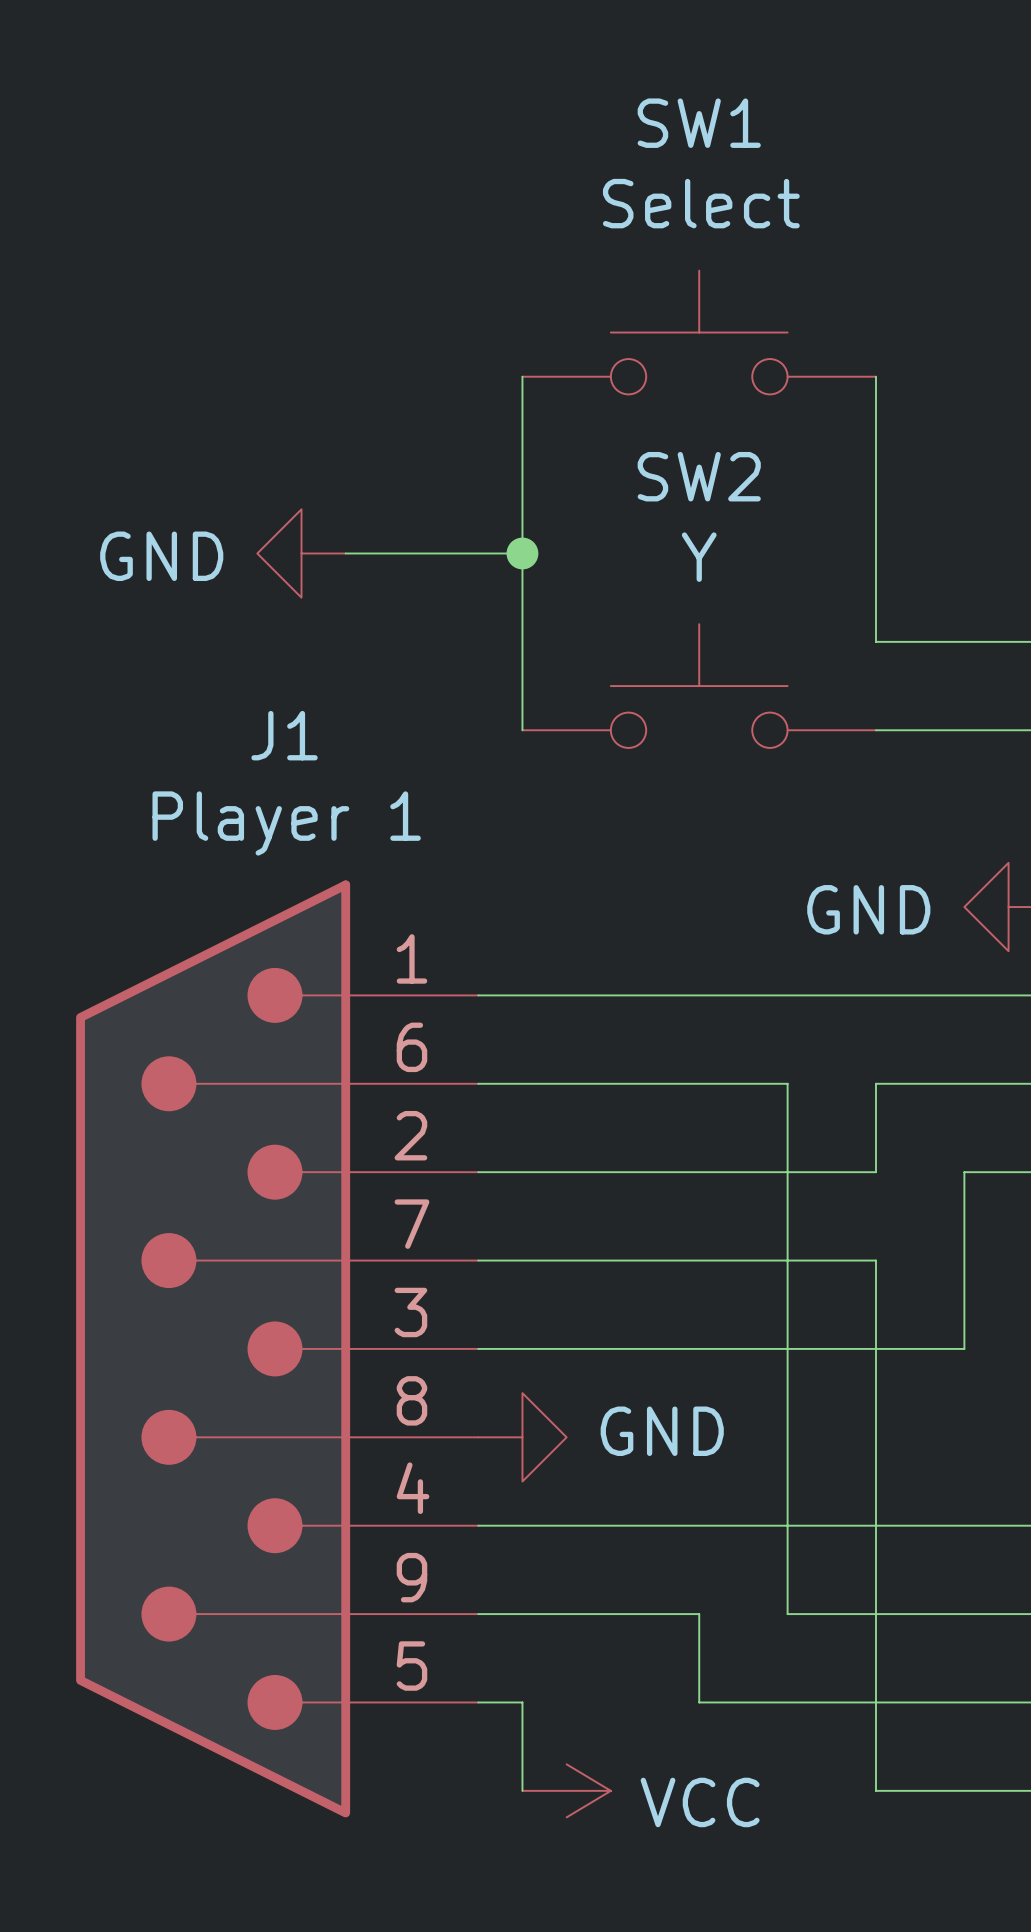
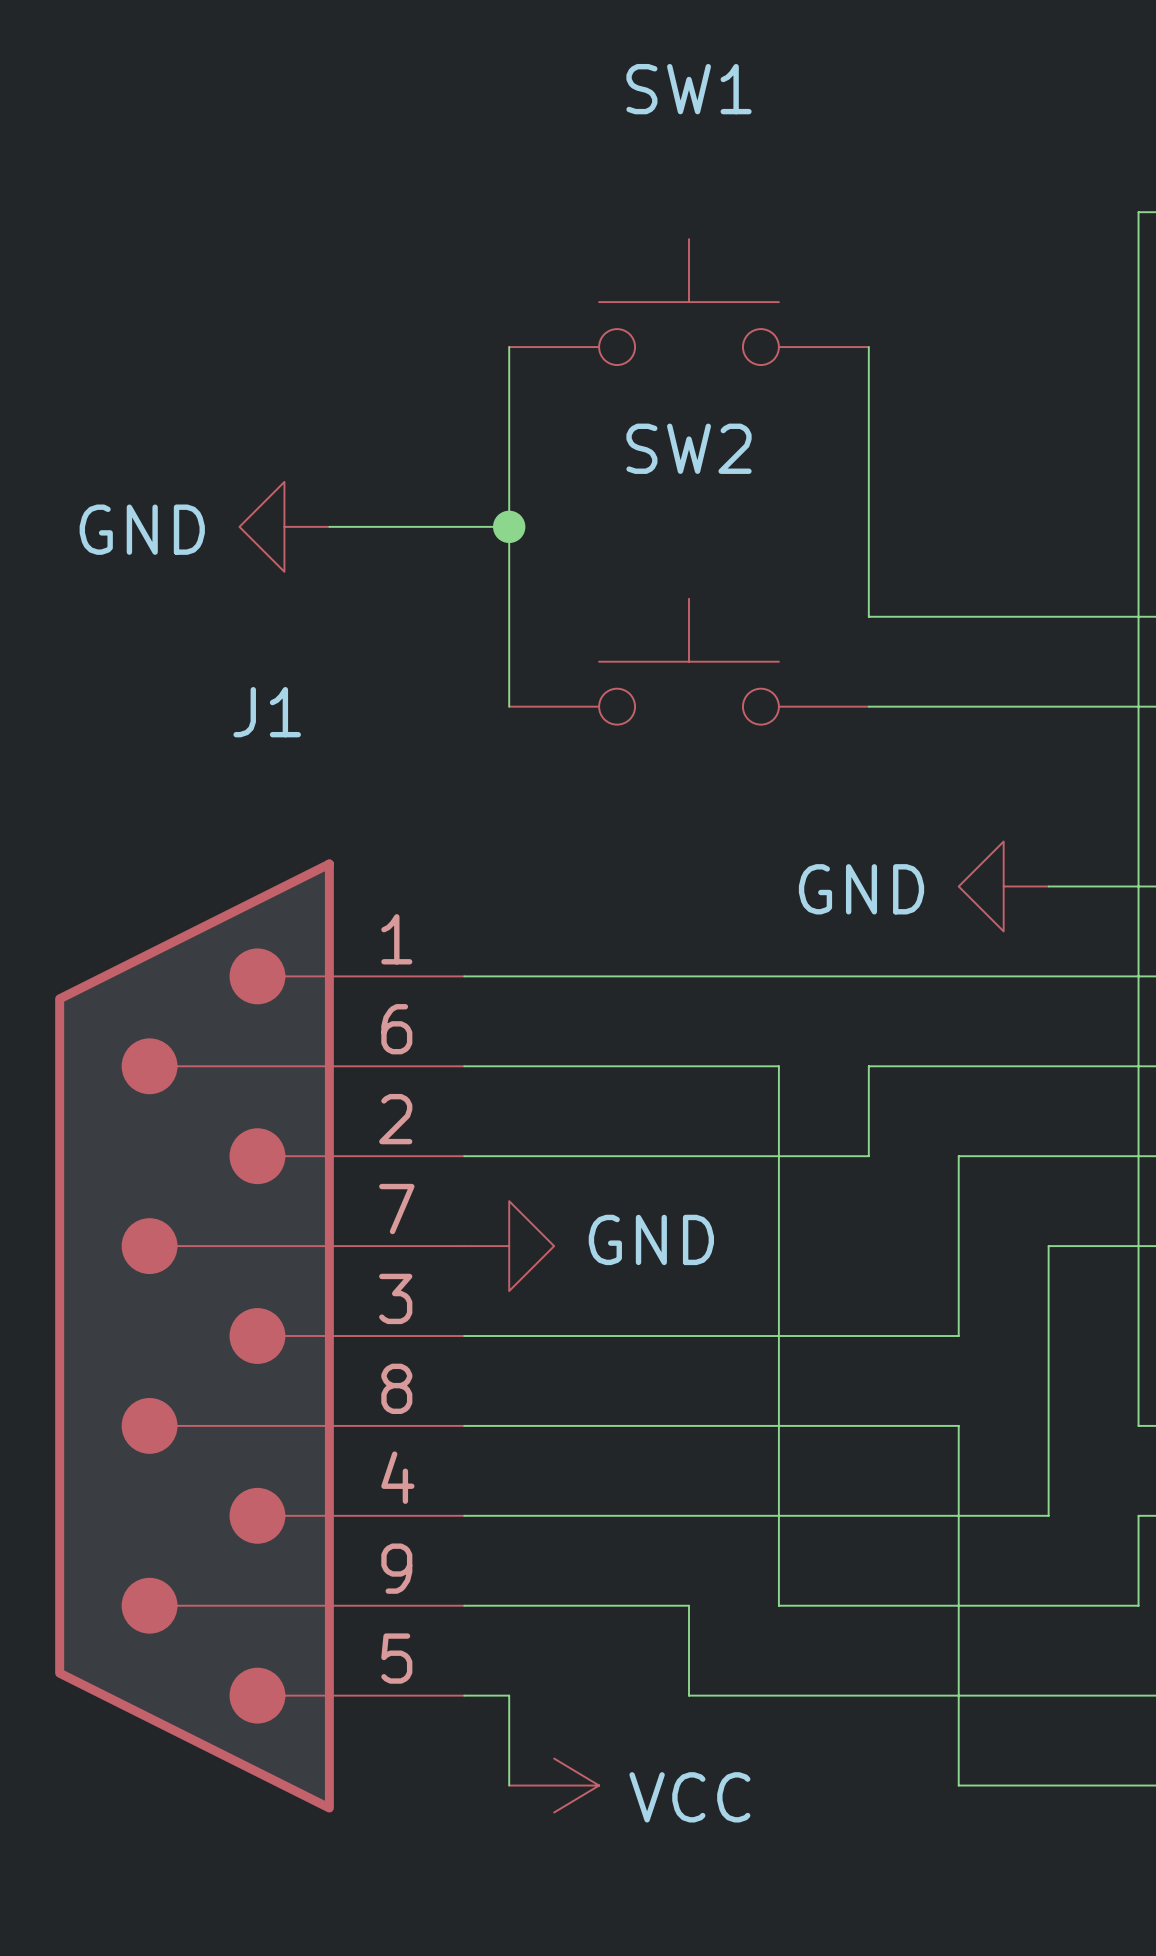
SW1 value: Select (701, 203) -> none
SW2 value: Y (699, 557) -> none
J1 value: Player 1 (286, 823) -> none
wire: (478, 1260) (875, 1260) (875, 1790) (964, 1790) -> (464, 1425) (958, 1425) (958, 1785)
power symbol position: GND (522, 1437) -> GND (509, 1246)

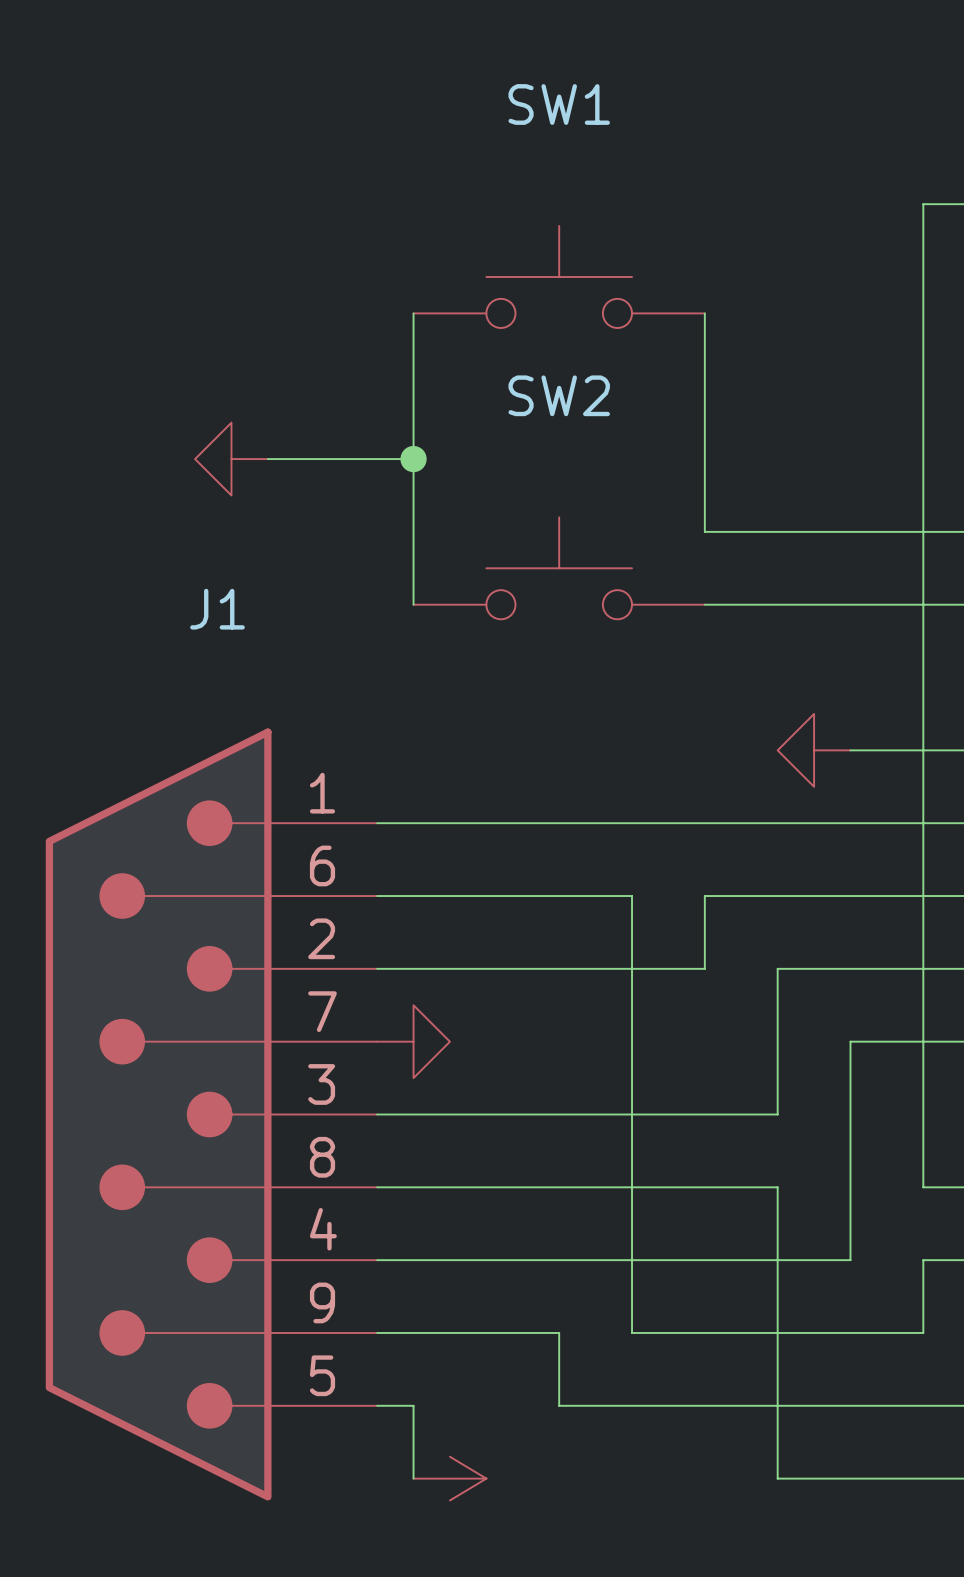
power symbol text: GND (142, 529) -> none
power symbol text: GND (861, 889) -> none
power symbol text: GND (651, 1239) -> none
power symbol text: VCC (689, 1797) -> none

